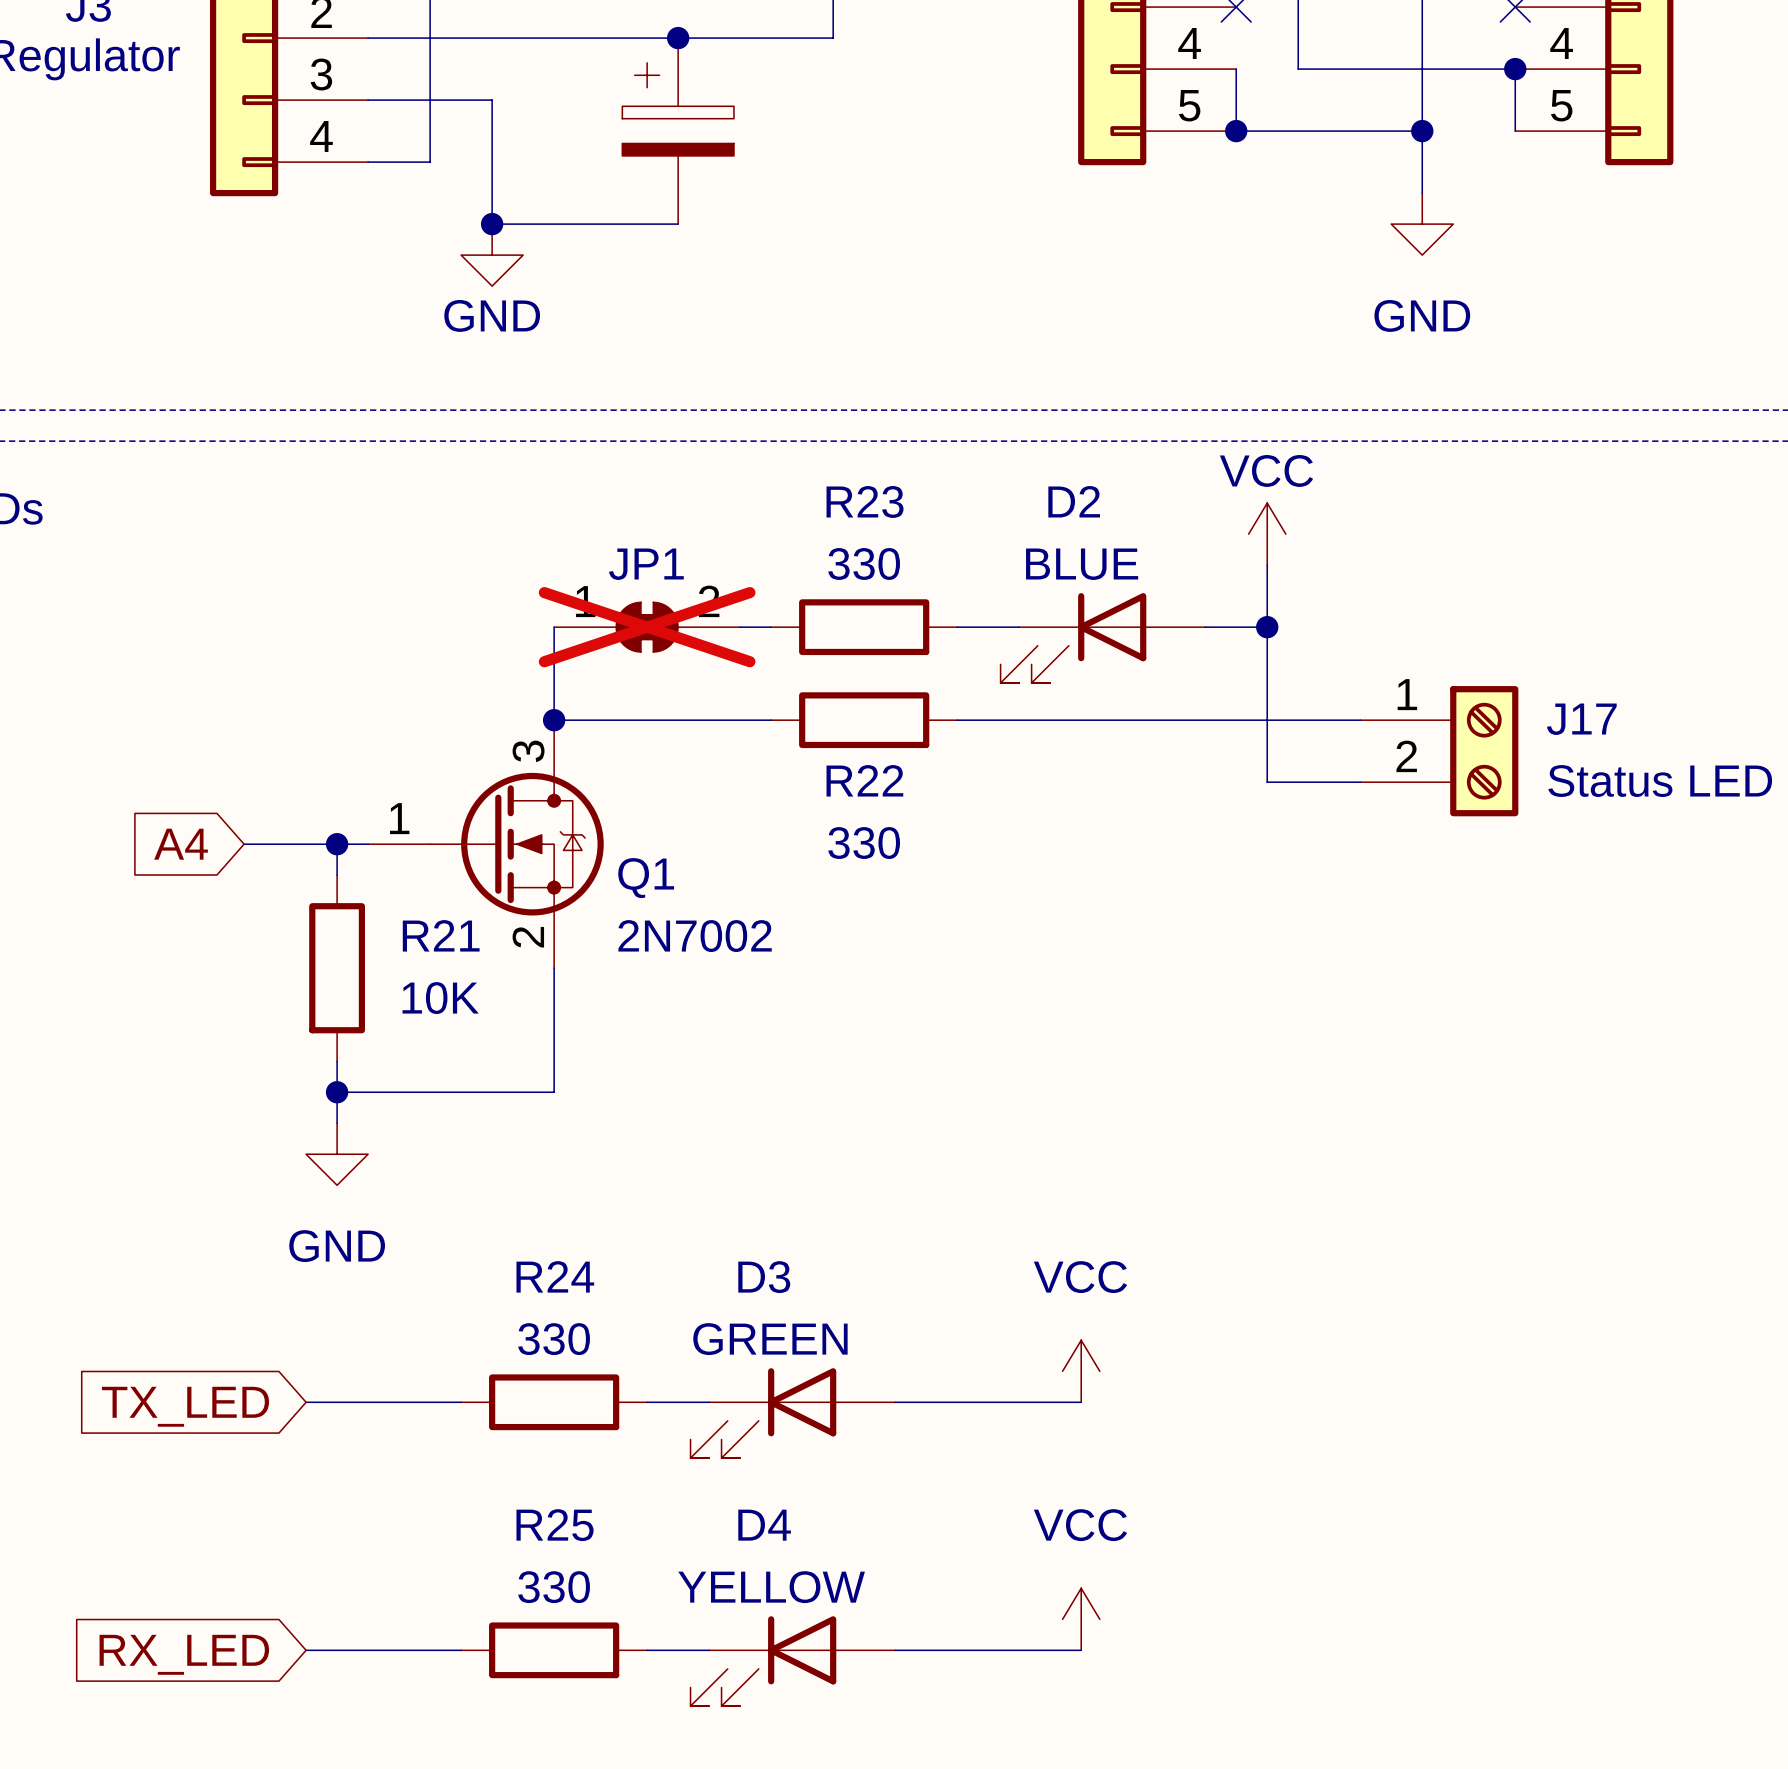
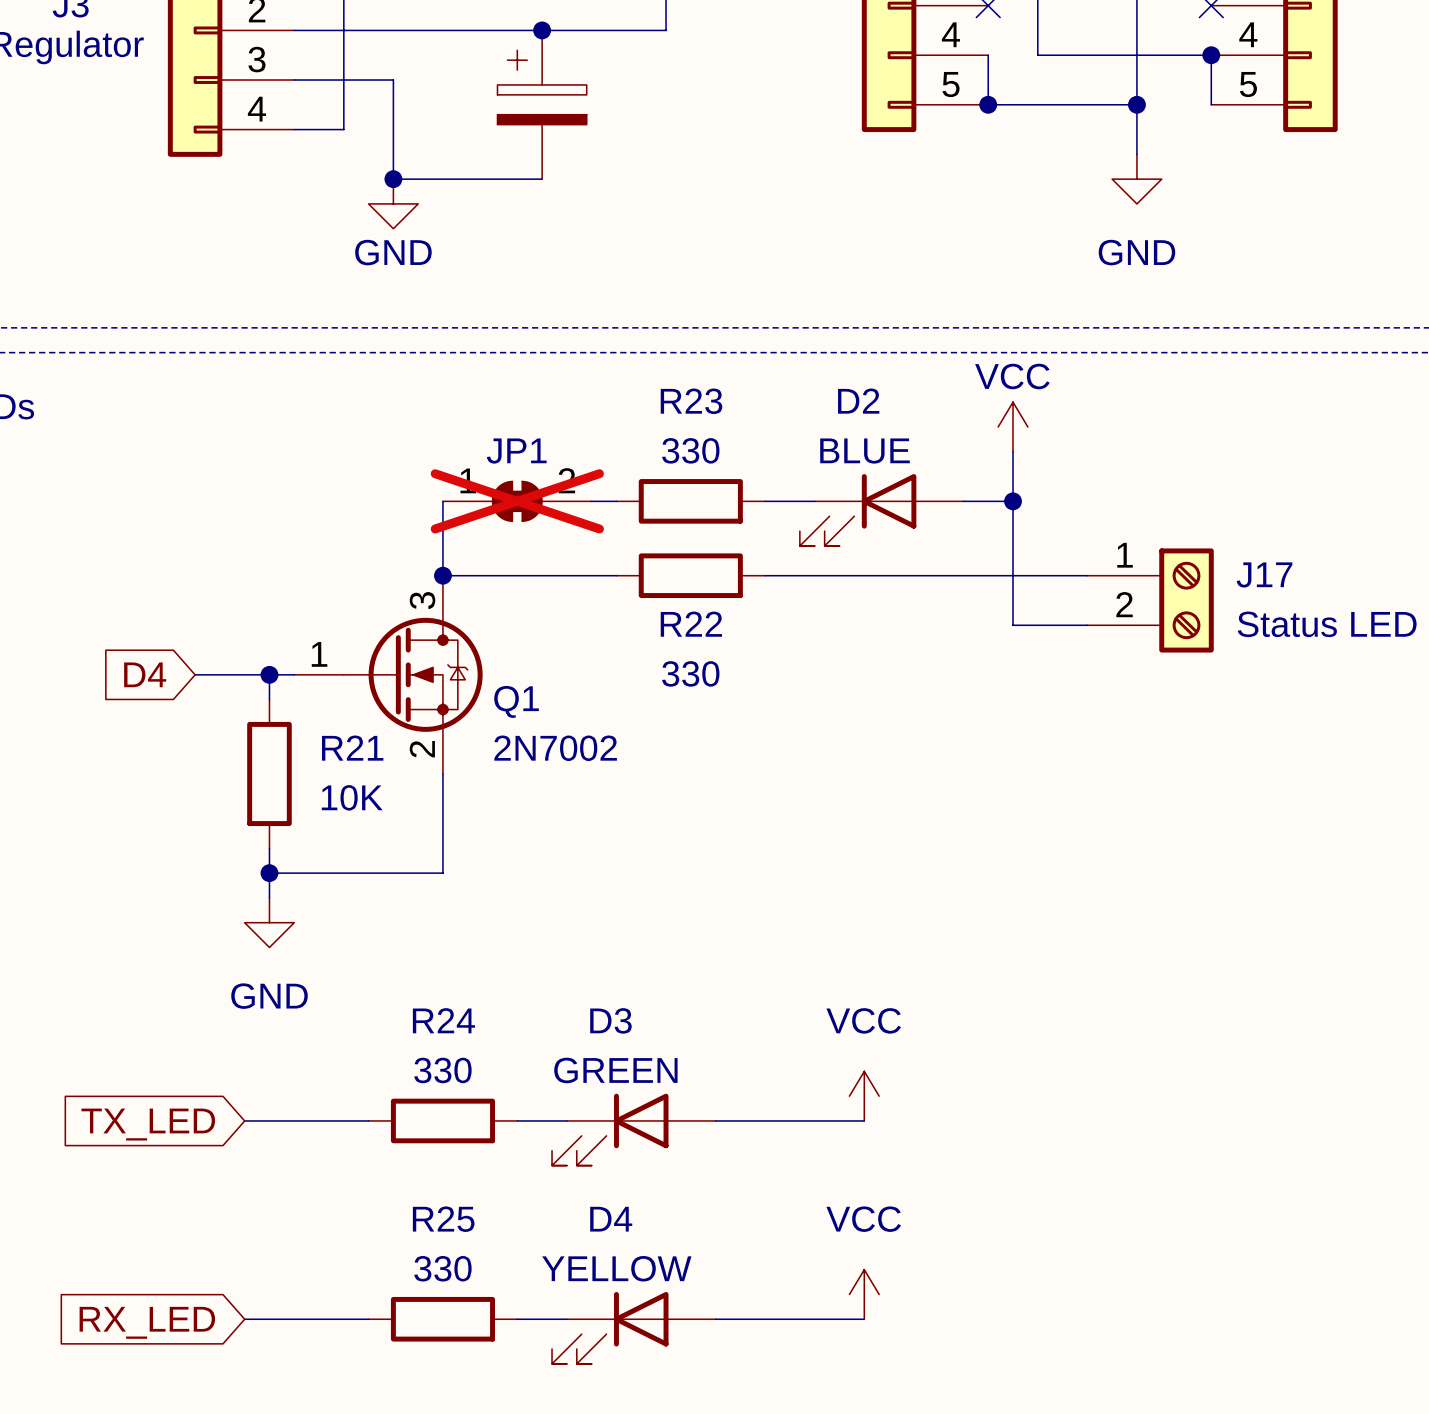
global label: A4 (181, 844) -> D4 (145, 674)

